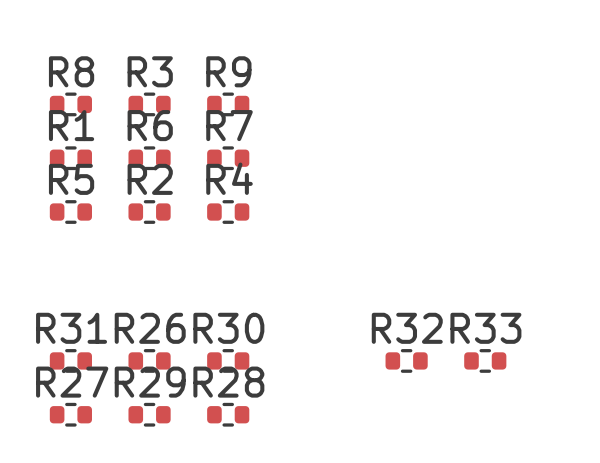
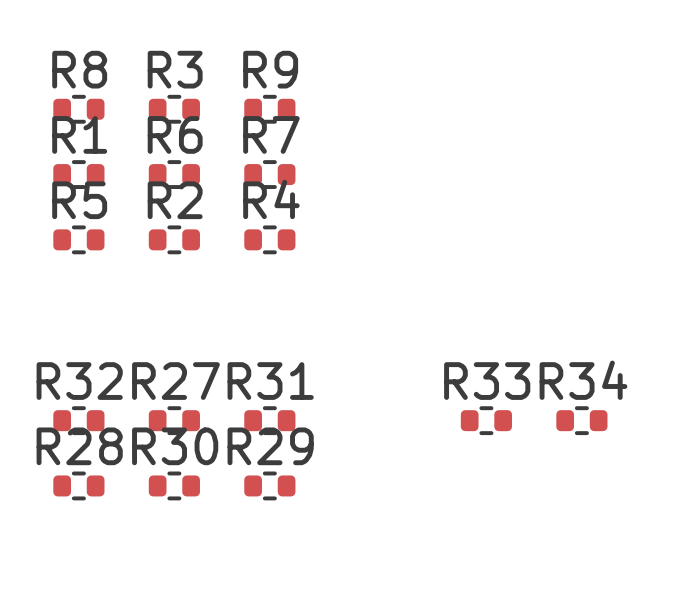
R31 name: R31 (71, 328) -> R32 (79, 381)
R26 name: R26 (150, 328) -> R27 (175, 381)
R30 name: R30 (228, 328) -> R31 (270, 381)
R32 name: R32 (407, 328) -> R33 (487, 381)
R33 name: R33 (485, 328) -> R34 (583, 380)
R27 name: R27 (72, 382) -> R28 (79, 446)
R29 name: R29 (150, 382) -> R30 (175, 446)
R28 name: R28 (228, 382) -> R29 (270, 446)

